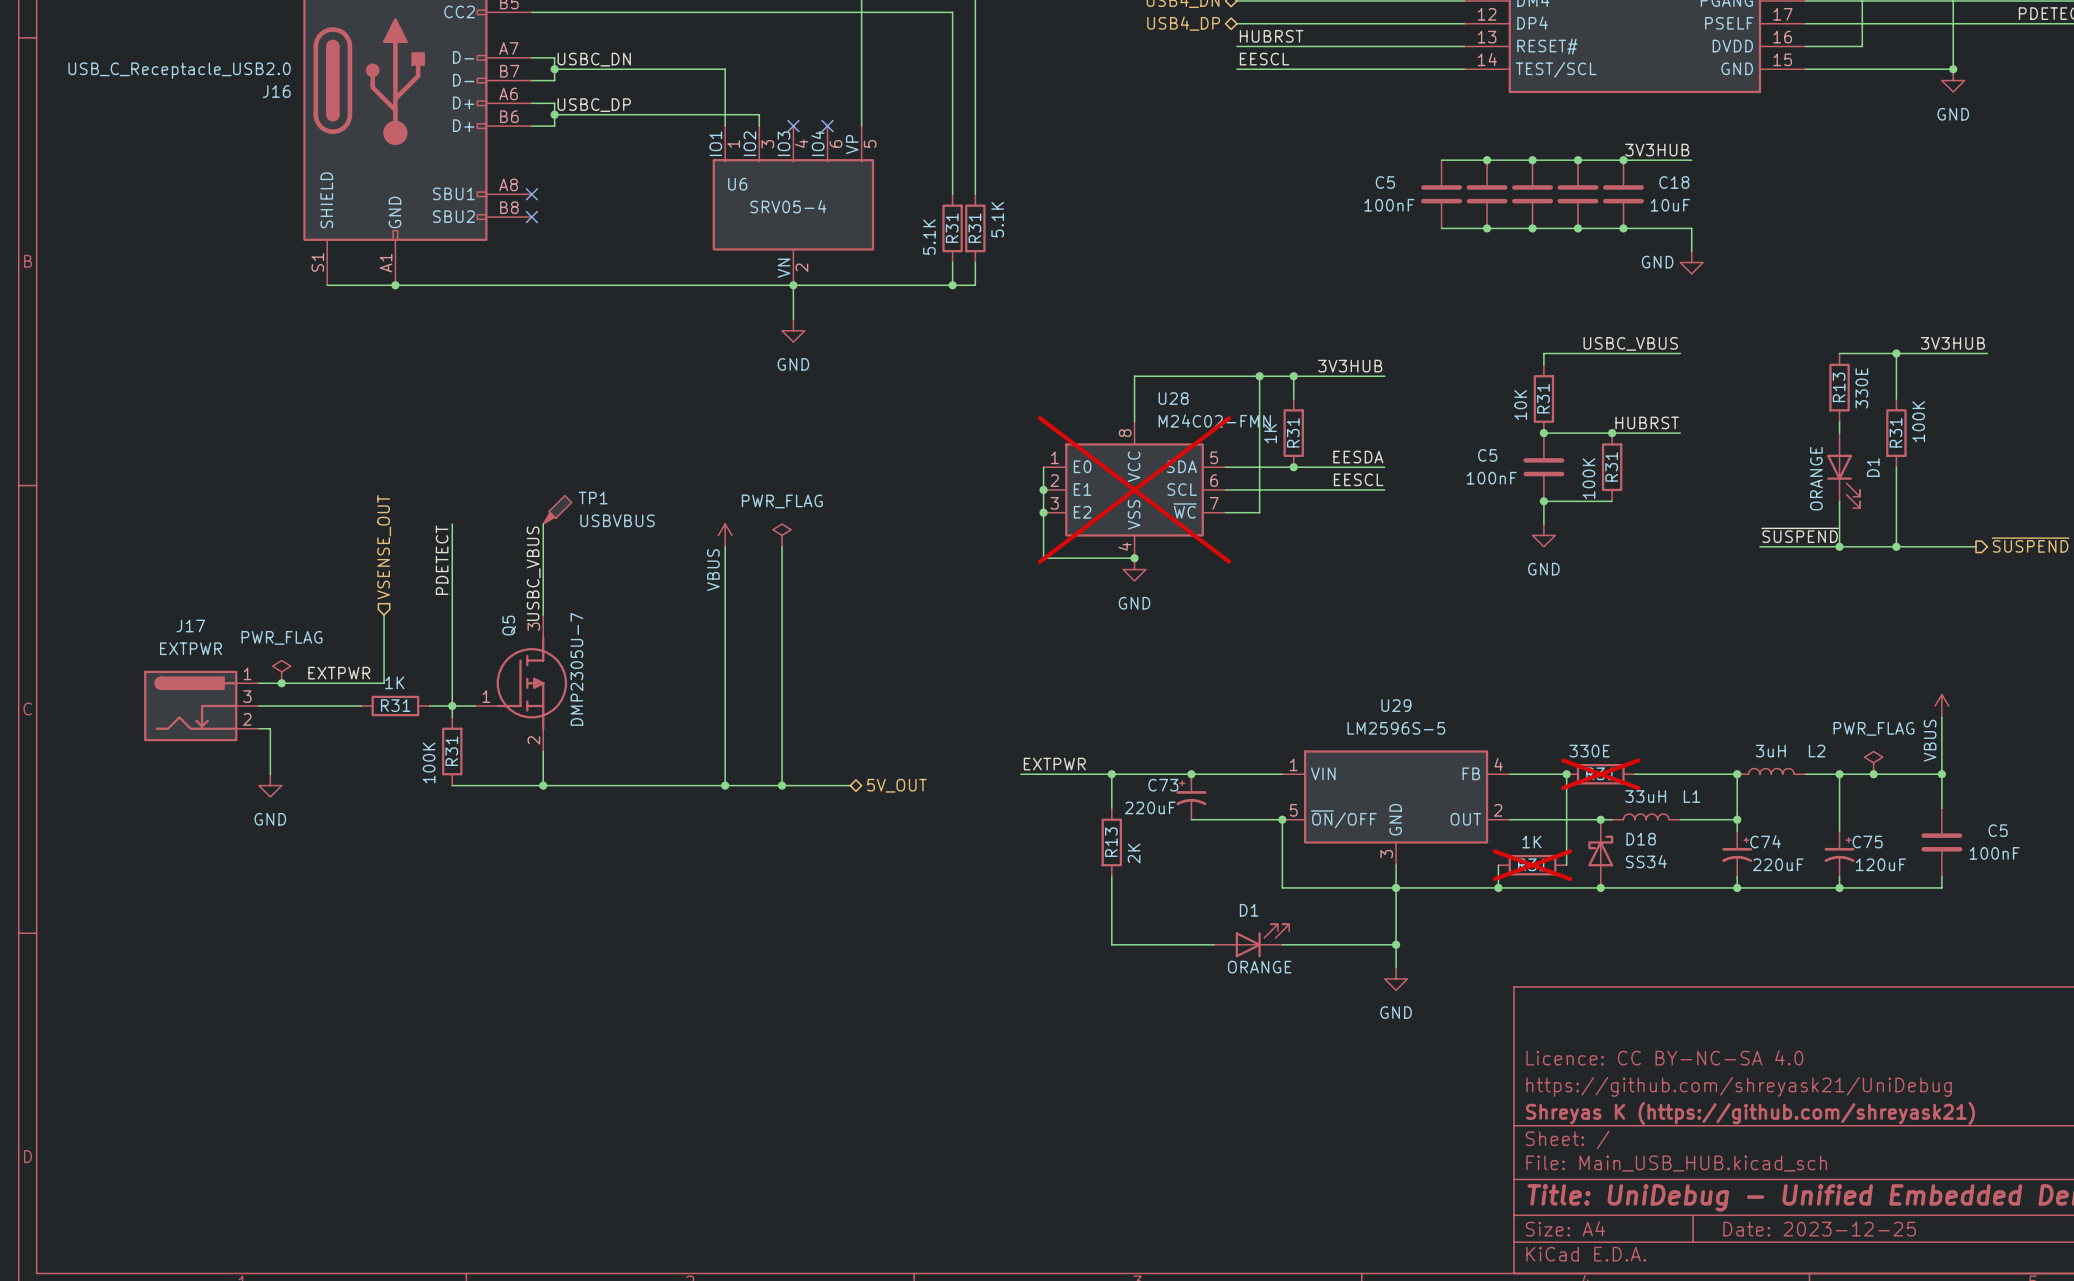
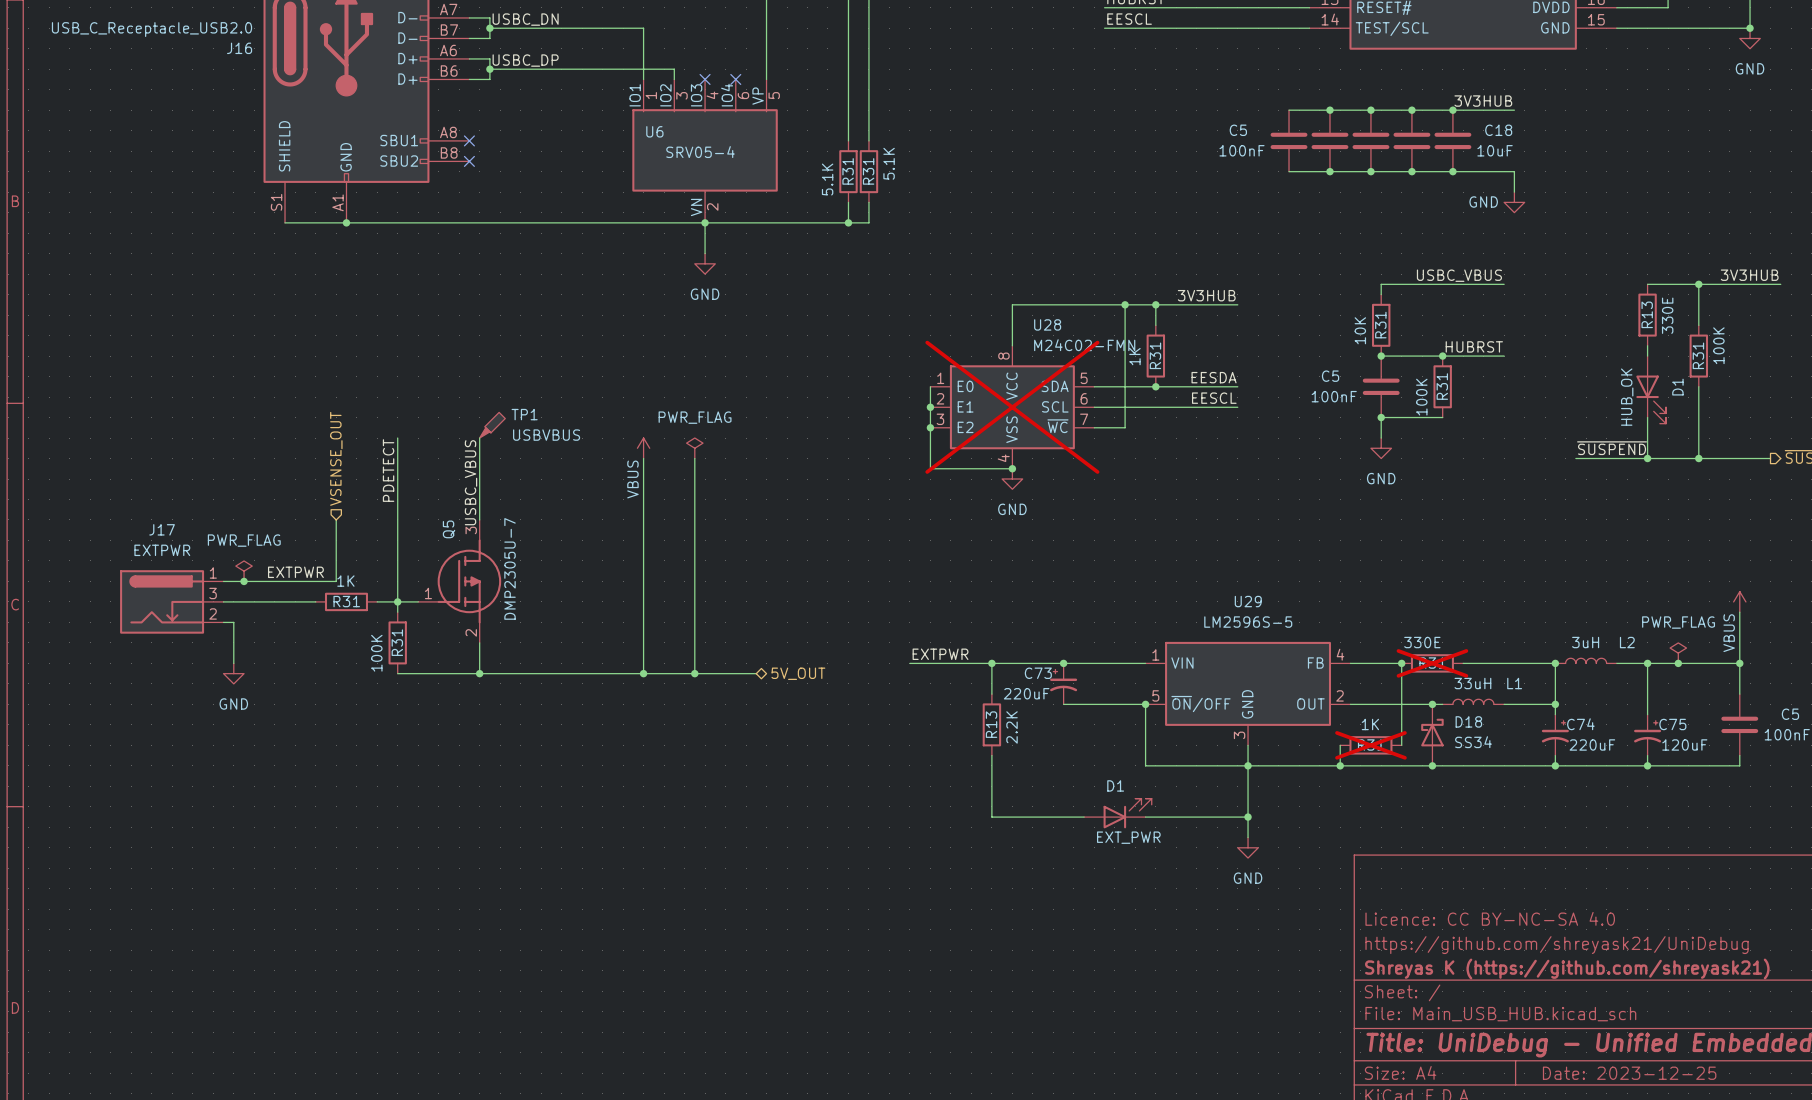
D1 value: ORANGE (1816, 478) -> HUB_OK (1627, 397)
R13 value: 2K (1134, 853) -> 2.2K (1012, 727)
D1 value: ORANGE (1259, 967) -> EXT_PWR (1128, 837)

